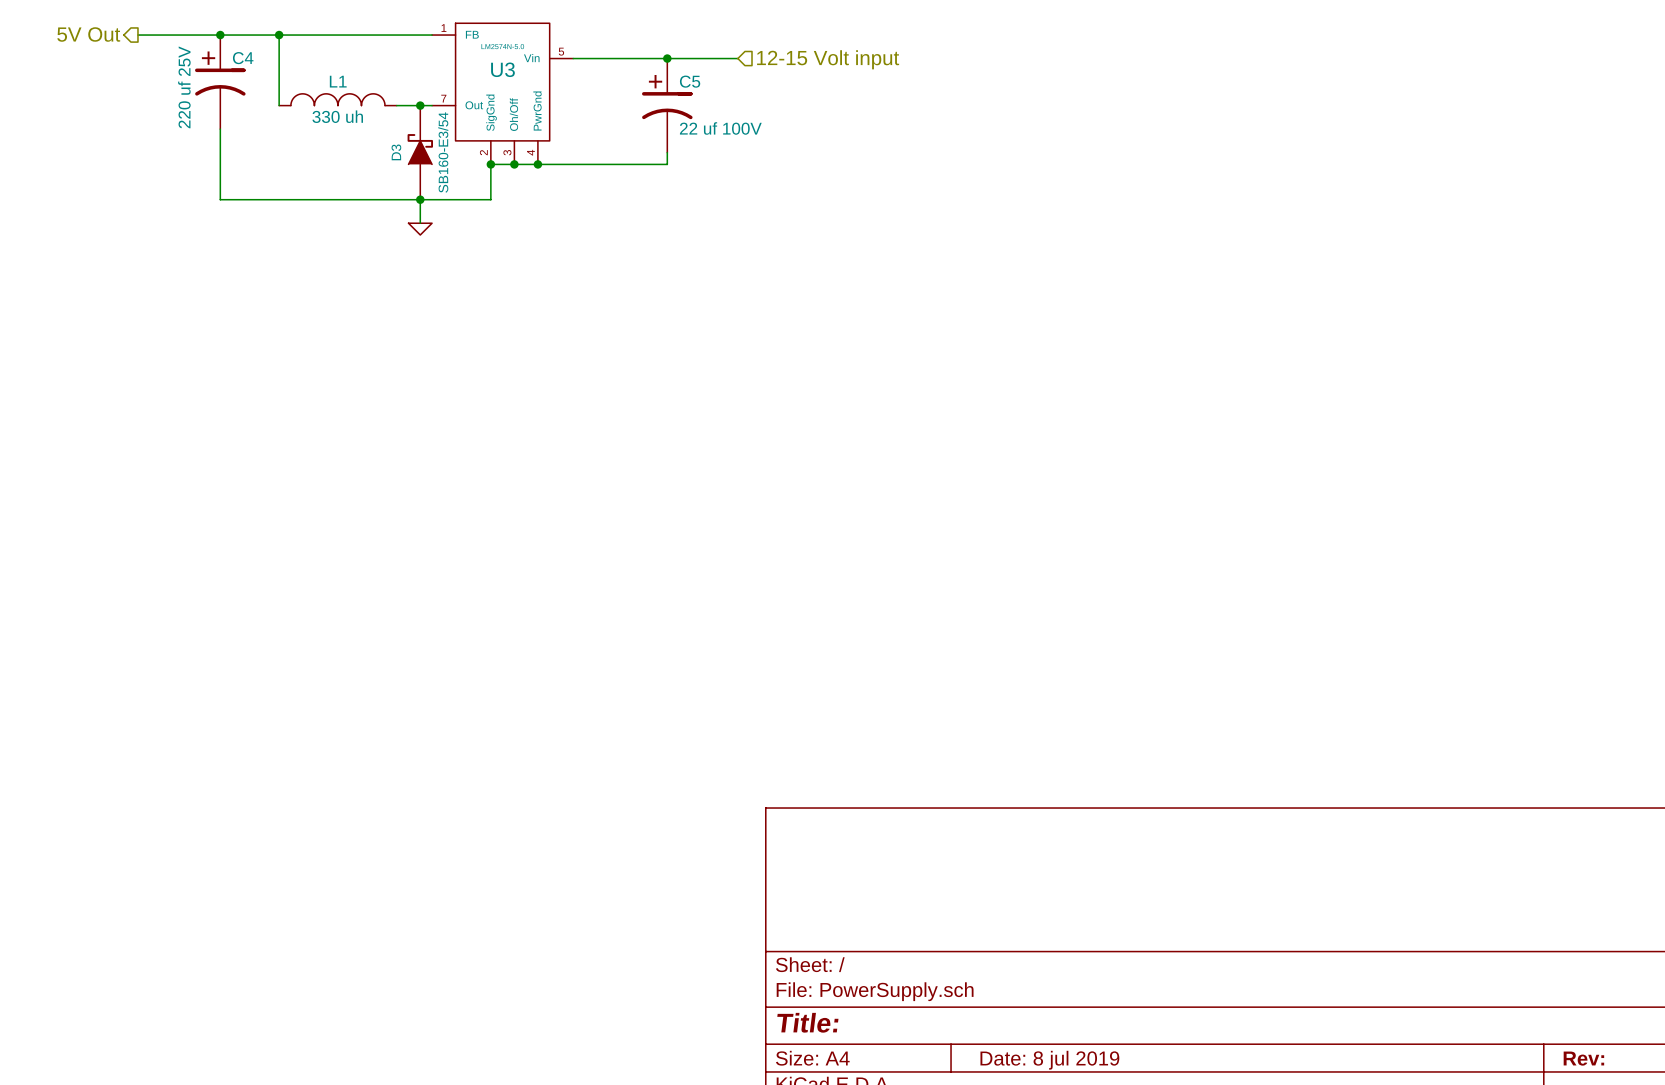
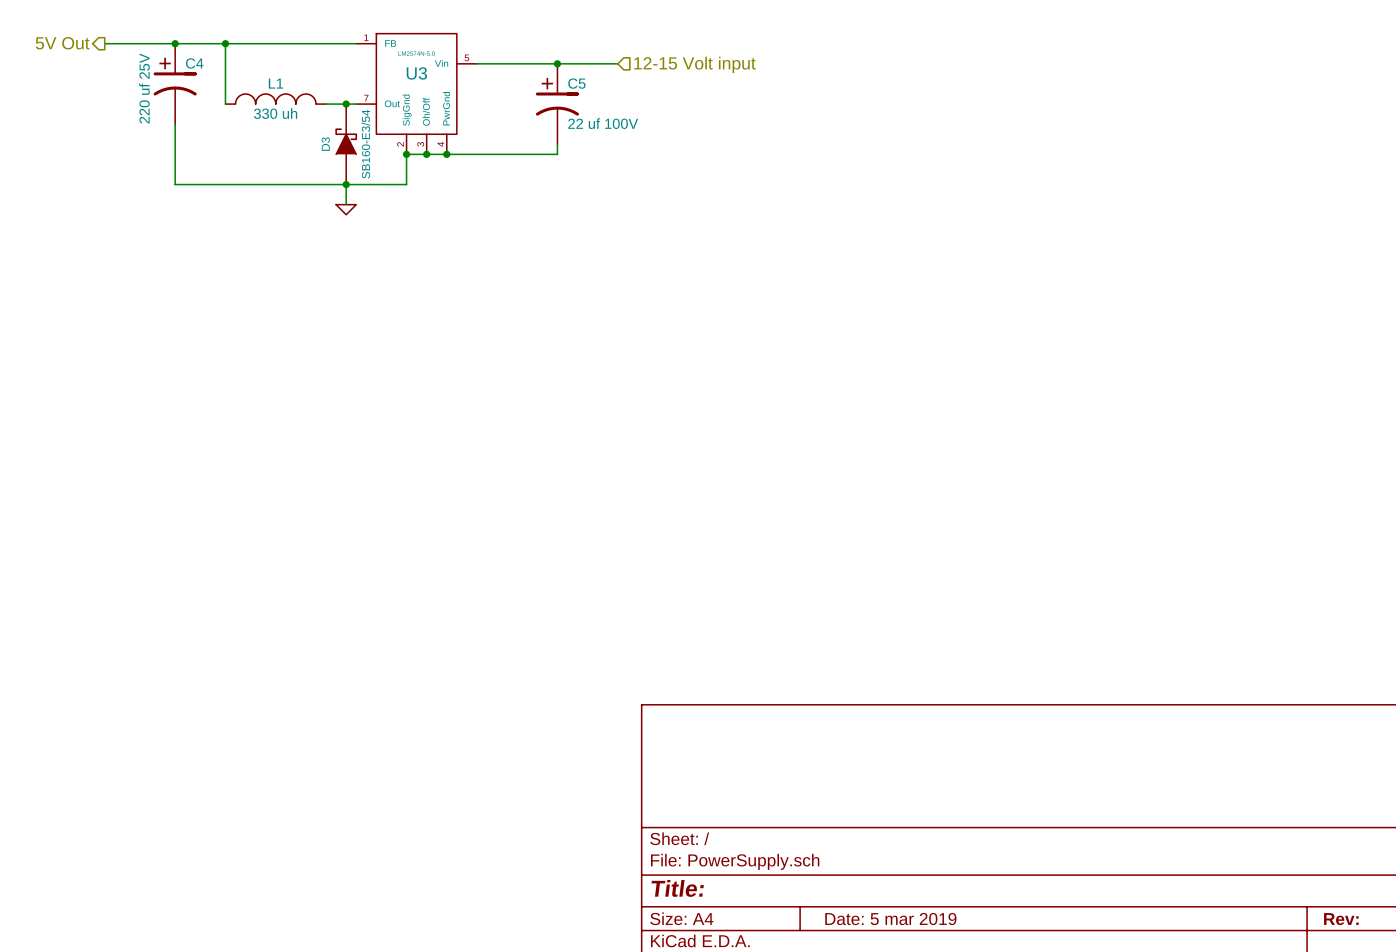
title block: Date: 8 jul 2019 (1049, 1060) -> Date: 5 mar 2019 (890, 919)

